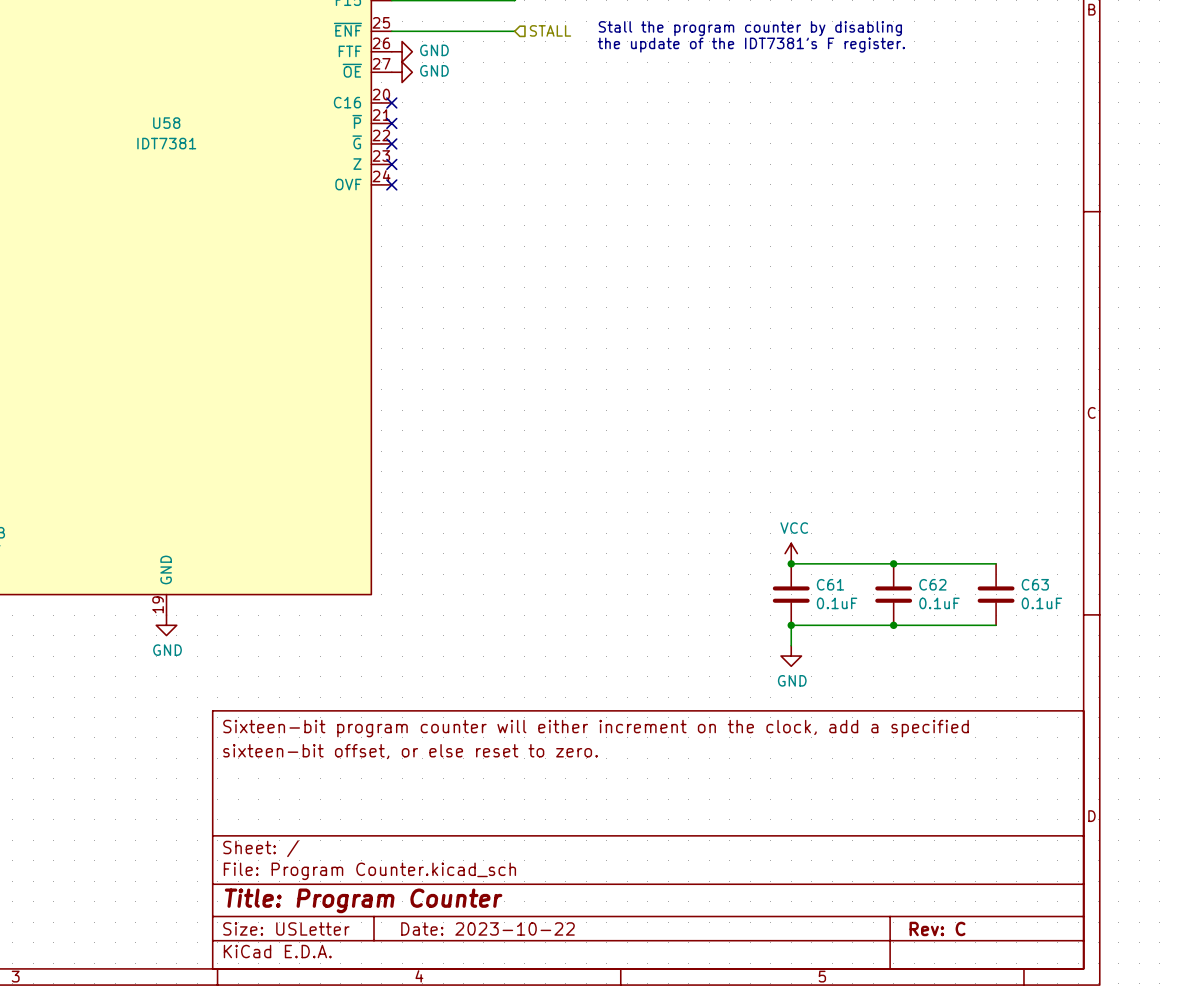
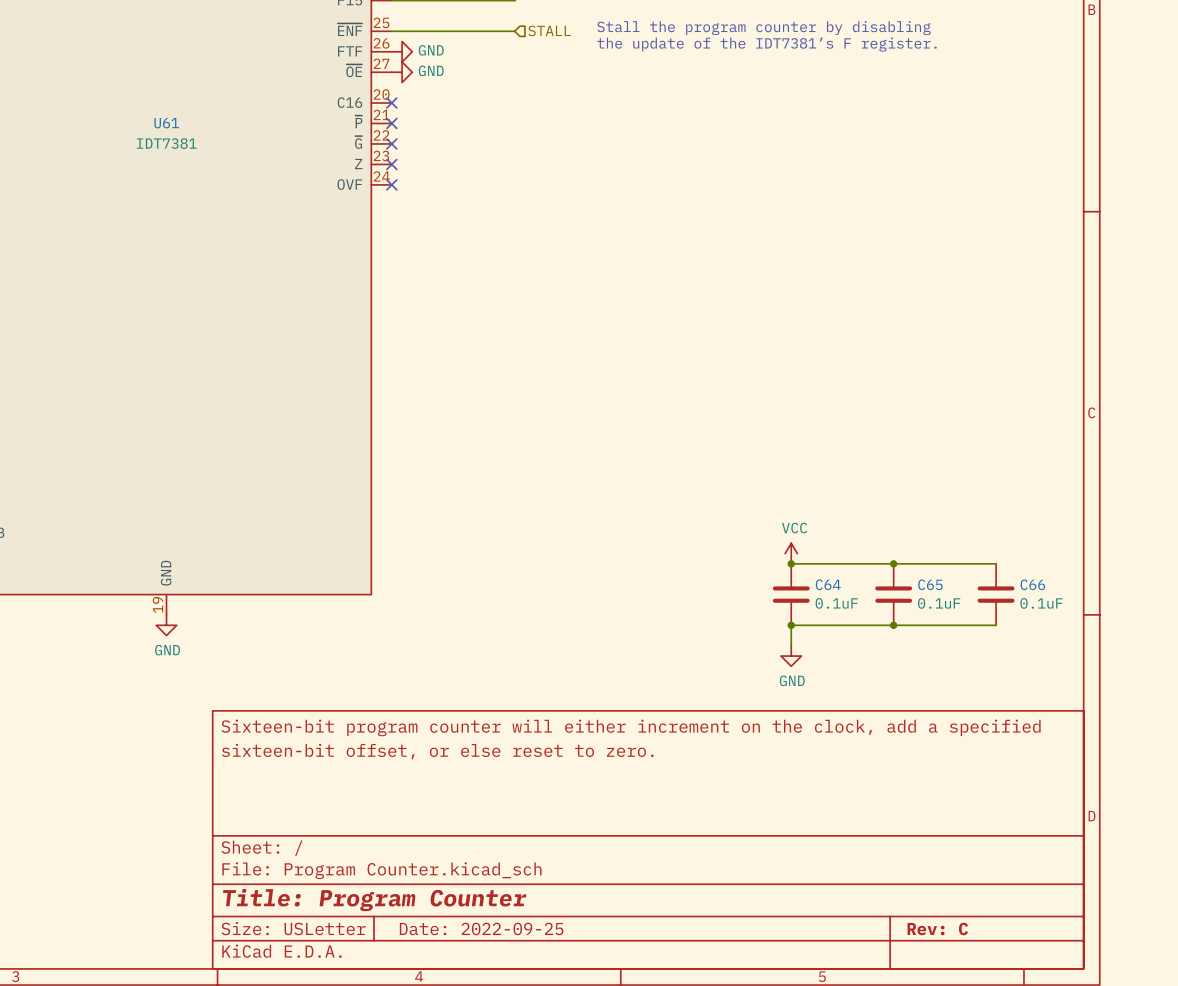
U58 name: U58 (166, 123) -> U61 (166, 123)
C61 name: C61 (830, 584) -> C64 (828, 584)
C62 name: C62 (932, 584) -> C65 (930, 584)
C63 name: C63 (1035, 584) -> C66 (1032, 584)
title block: Date: 2023-10-22 (487, 928) -> Date: 2022-09-25 (481, 928)

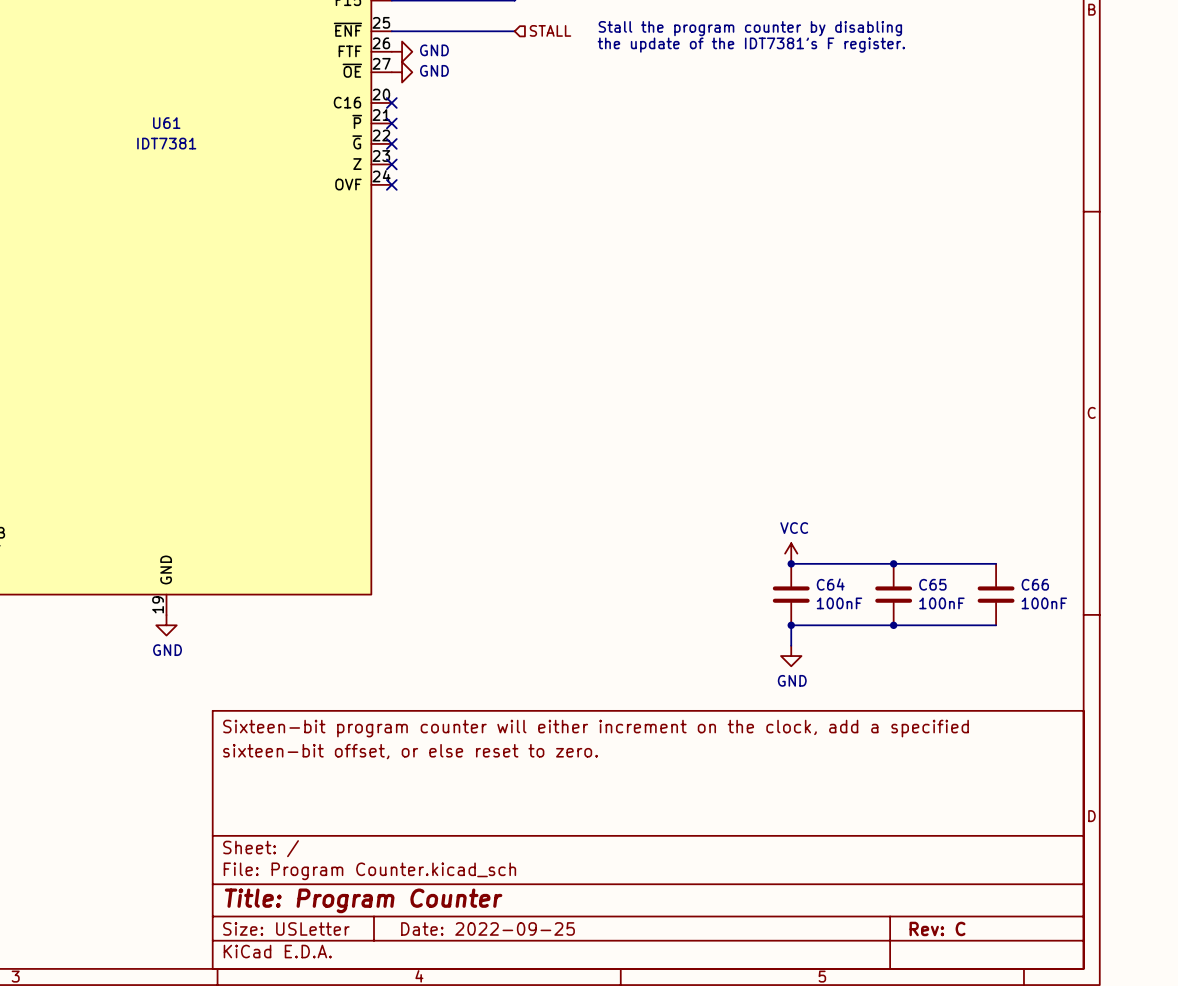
C64 value: 0.1uF (836, 603) -> 100nF (839, 603)
C65 value: 0.1uF (939, 603) -> 100nF (941, 603)
C66 value: 0.1uF (1041, 603) -> 100nF (1044, 603)

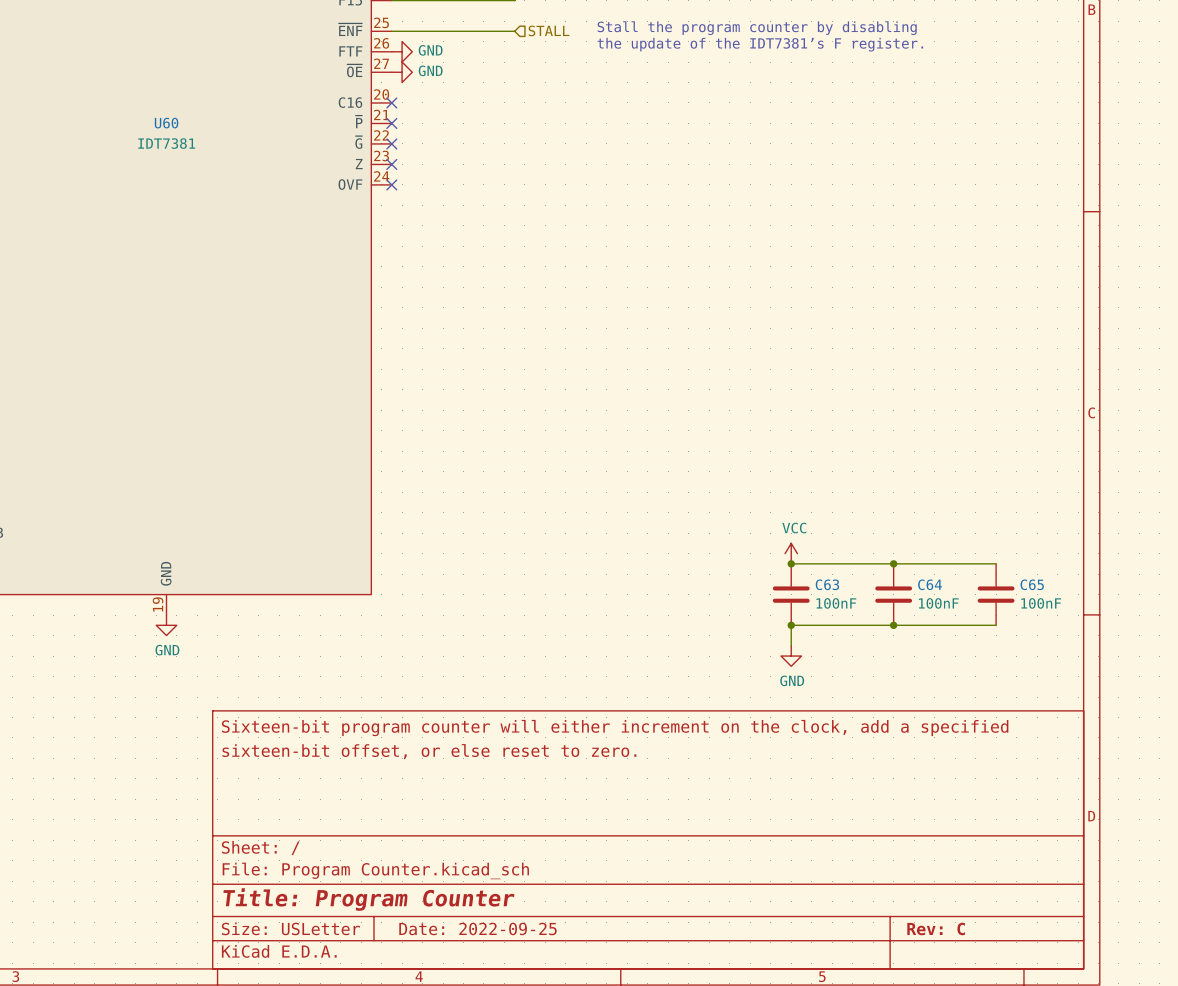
U61 name: U61 (166, 123) -> U60 (166, 123)
C64 name: C64 (830, 584) -> C63 (827, 584)
C65 name: C65 (932, 584) -> C64 (930, 584)
C66 name: C66 (1035, 584) -> C65 (1032, 584)

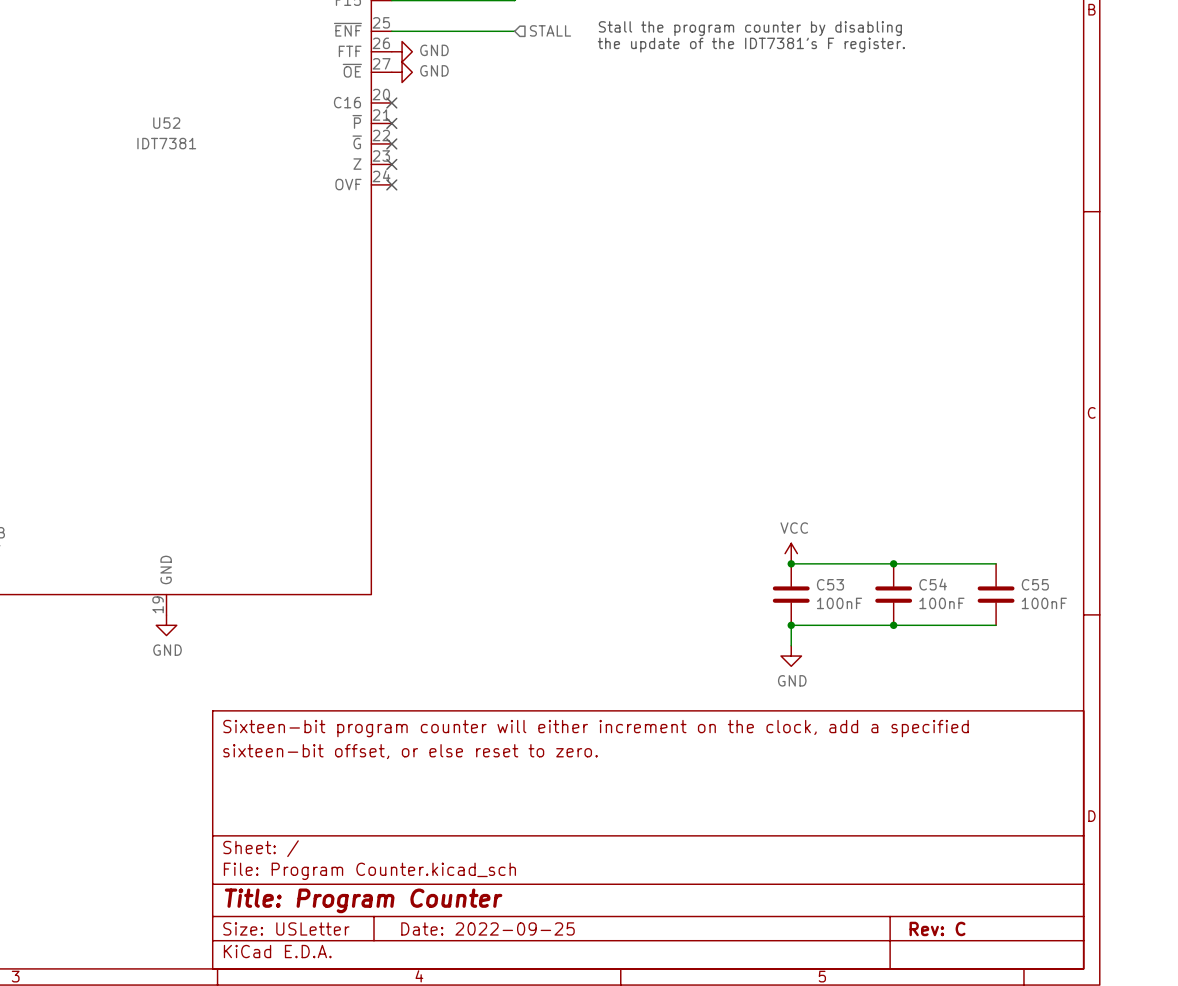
U60 name: U60 (166, 123) -> U52 (166, 123)
C63 name: C63 (827, 584) -> C53 (830, 584)
C64 name: C64 (930, 584) -> C54 (933, 584)
C65 name: C65 (1032, 584) -> C55 (1035, 584)

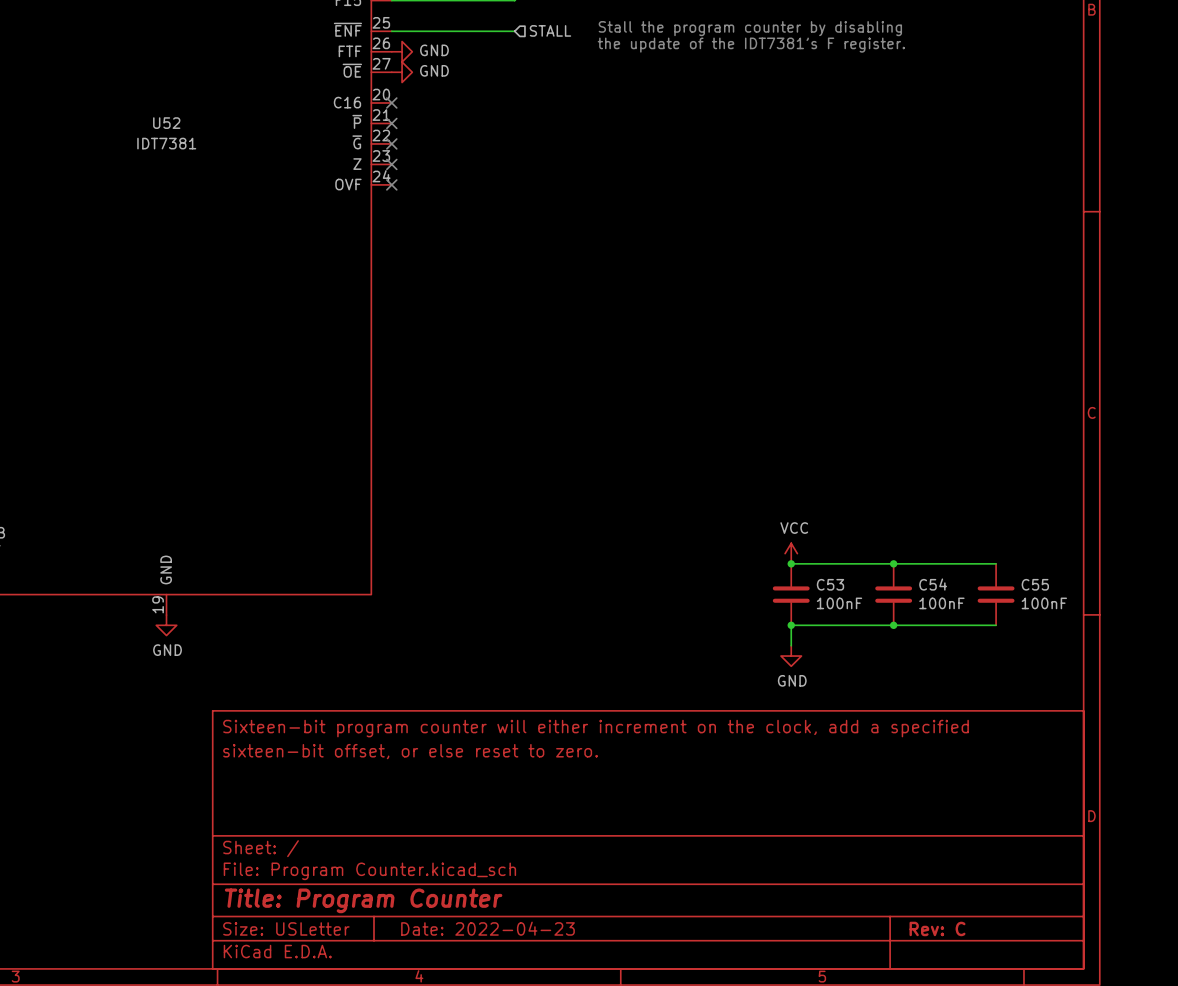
title block: Date: 2022-09-25 (487, 928) -> Date: 2022-04-23 (487, 928)

